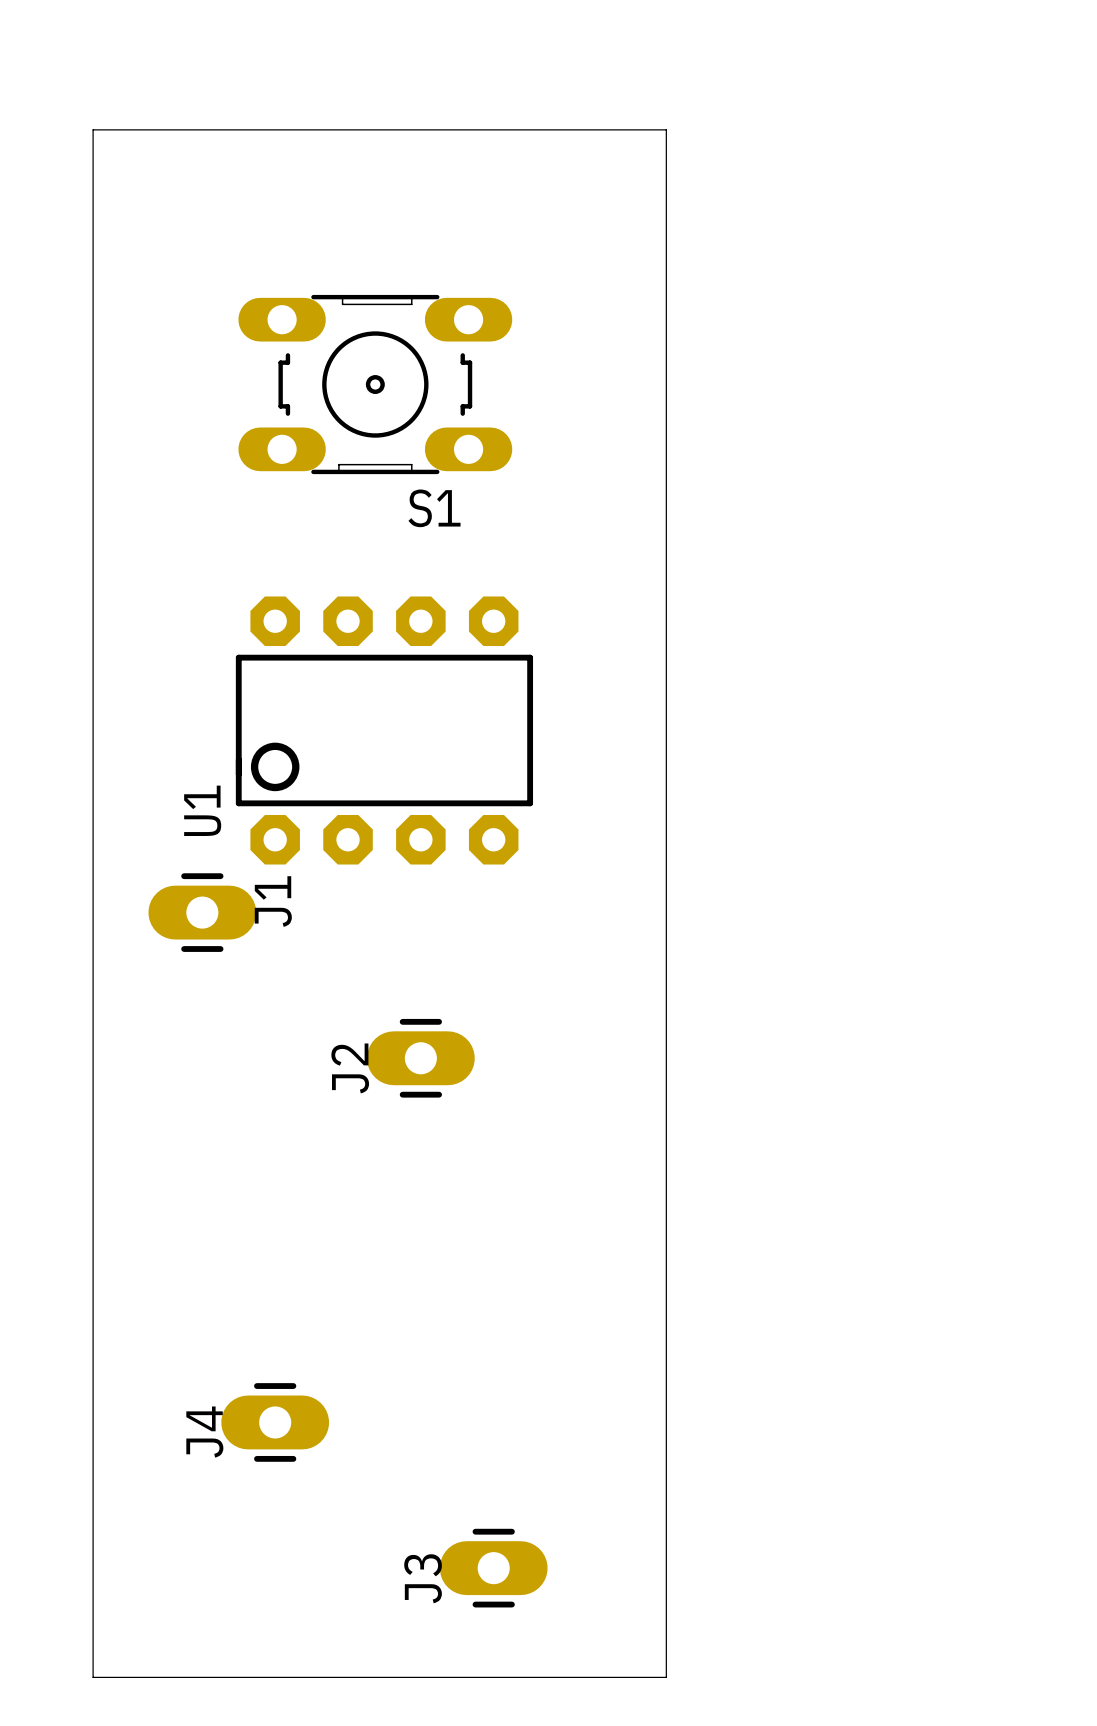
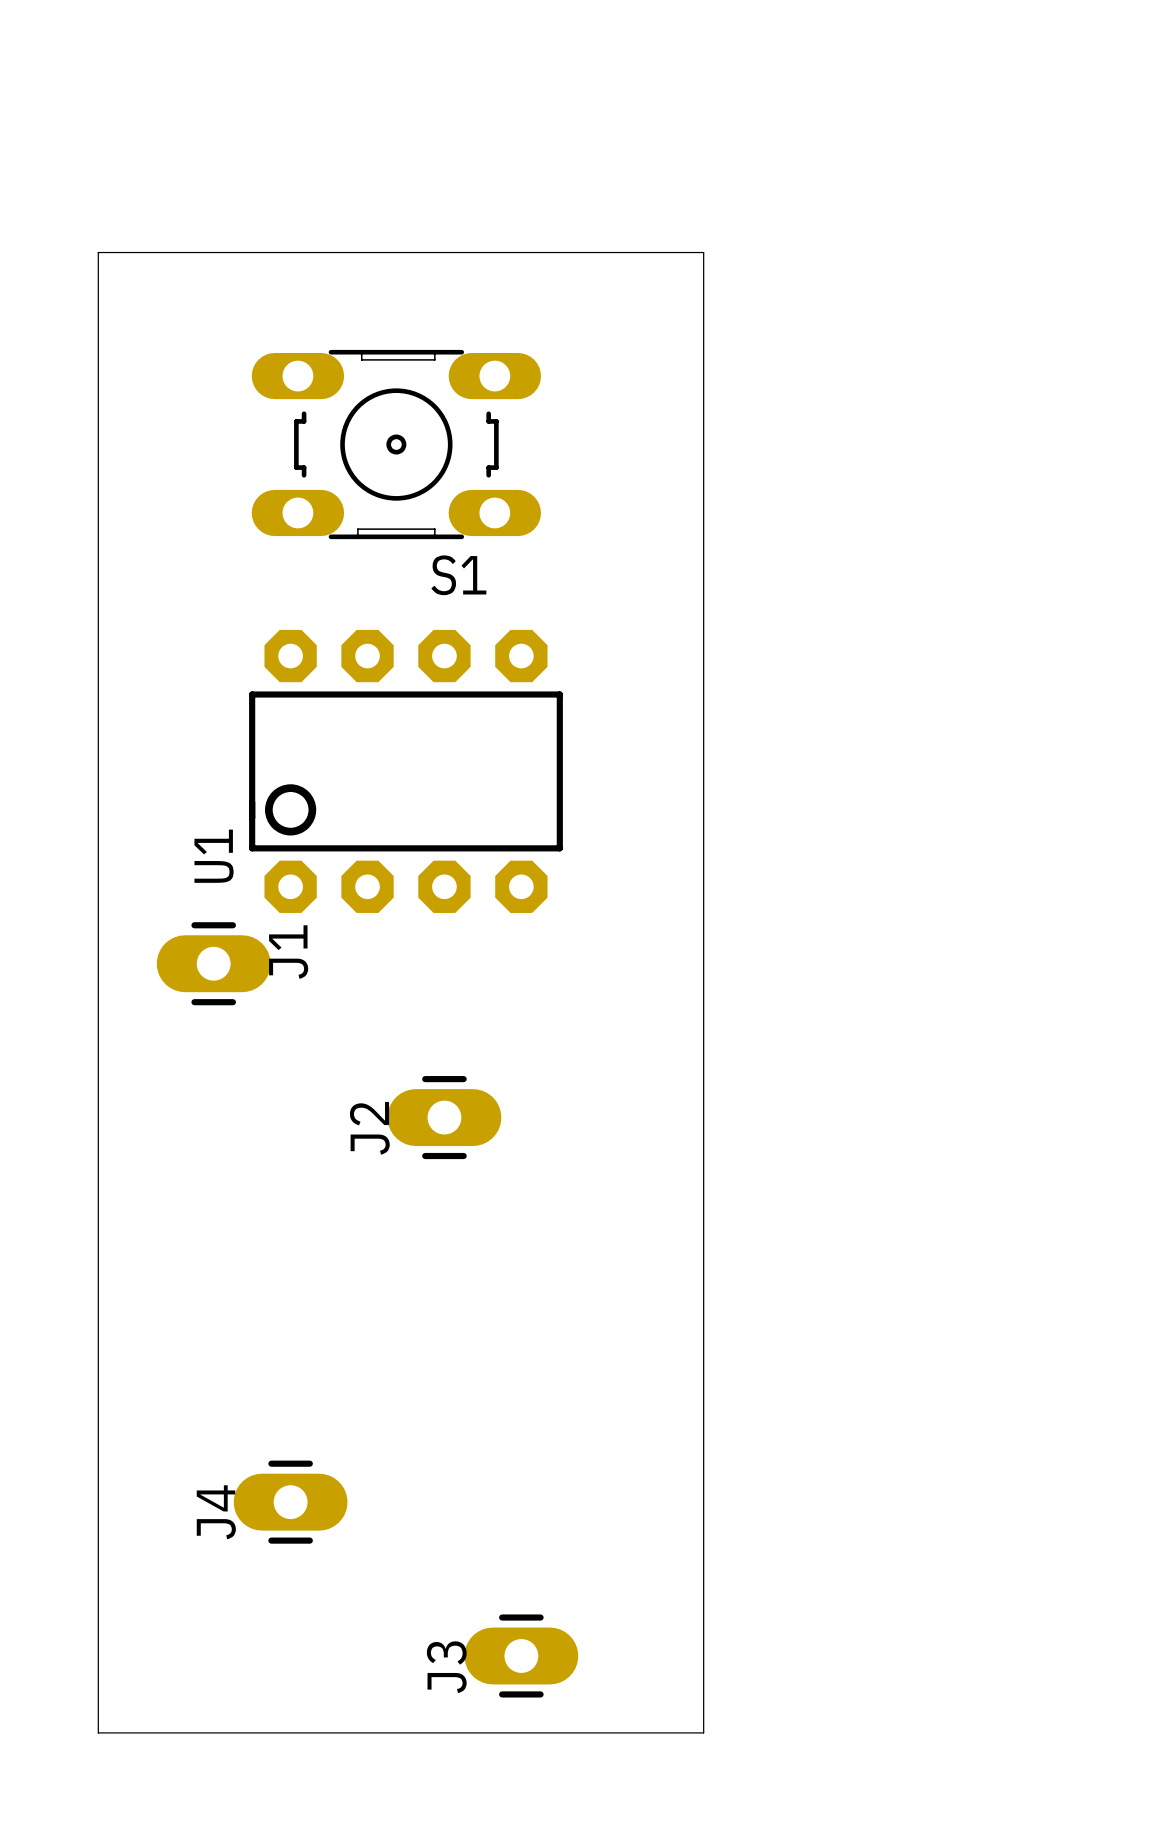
board edge: (93, 239) (93, 129) (666, 129) (666, 239) -> (98, 252) (703, 252)
S1 position: (375, 384) -> (396, 444)
board edge: (93, 1640) (93, 1677) (666, 1677) (666, 1640) -> (98, 1732) (703, 1732)

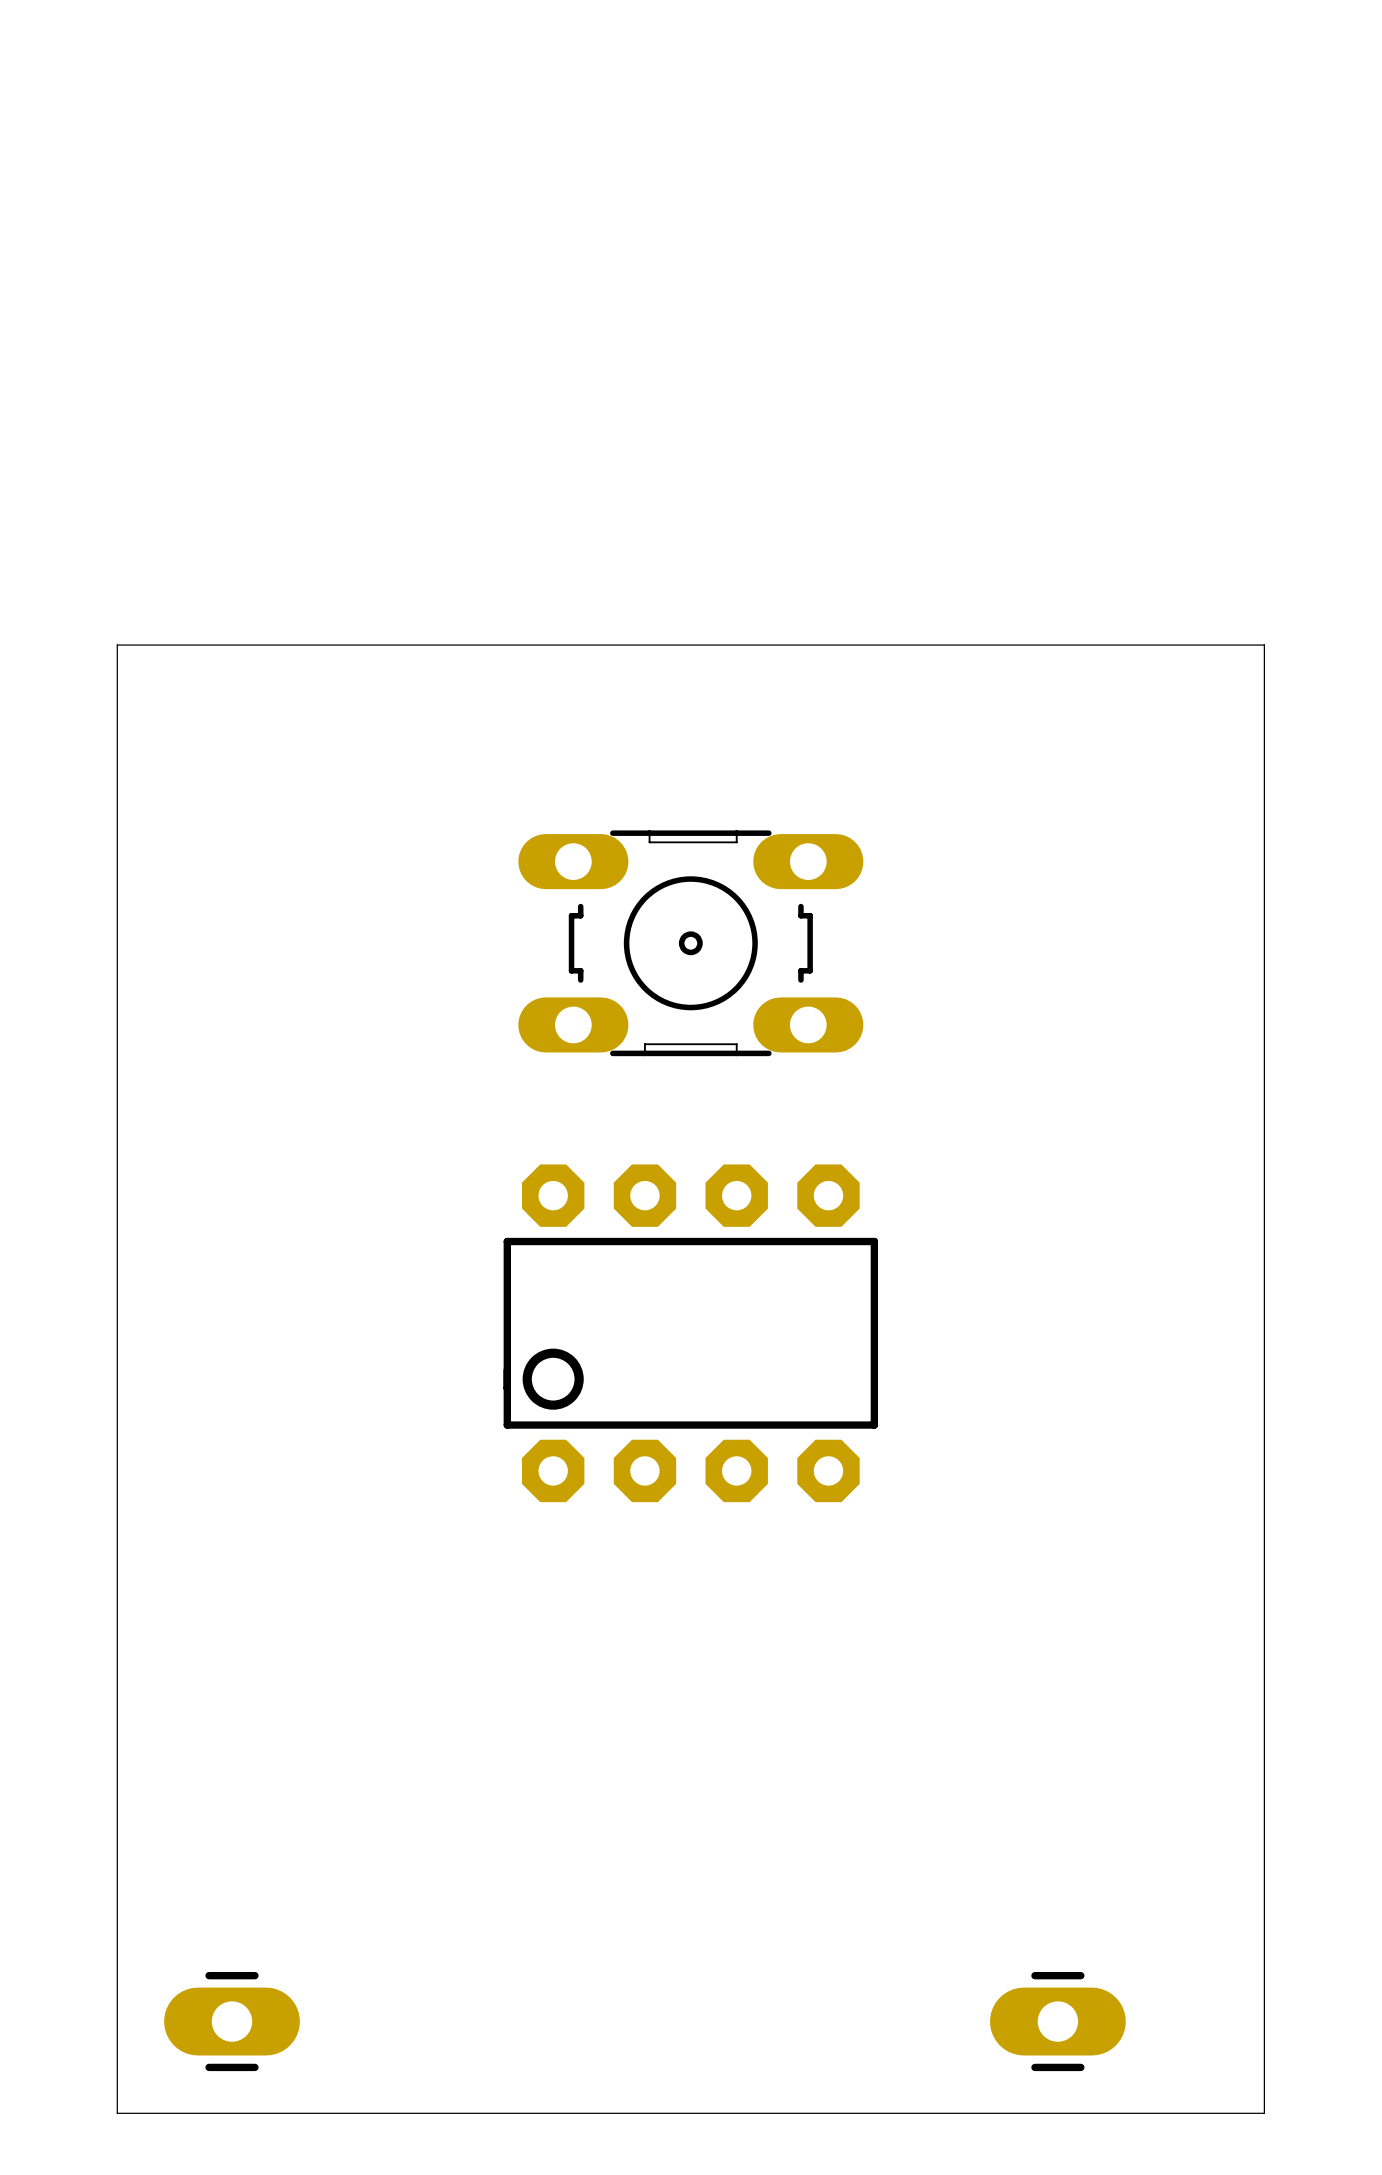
S1: (396, 444) -> none
board edge: (98, 540) (98, 252) (703, 252) (703, 1732) (98, 1732) -> (117, 645) (1264, 645) (1264, 2113) (117, 2113) (117, 2067)
U1: (405, 771) -> none
part: none -> (690, 943)
J1: (213, 963) -> none
J2: (444, 1117) -> none
part: none -> (690, 1333)
J4: (290, 1502) -> none
J3: (521, 1655) -> none
part: none -> (232, 2021)
part: none -> (1057, 2021)

